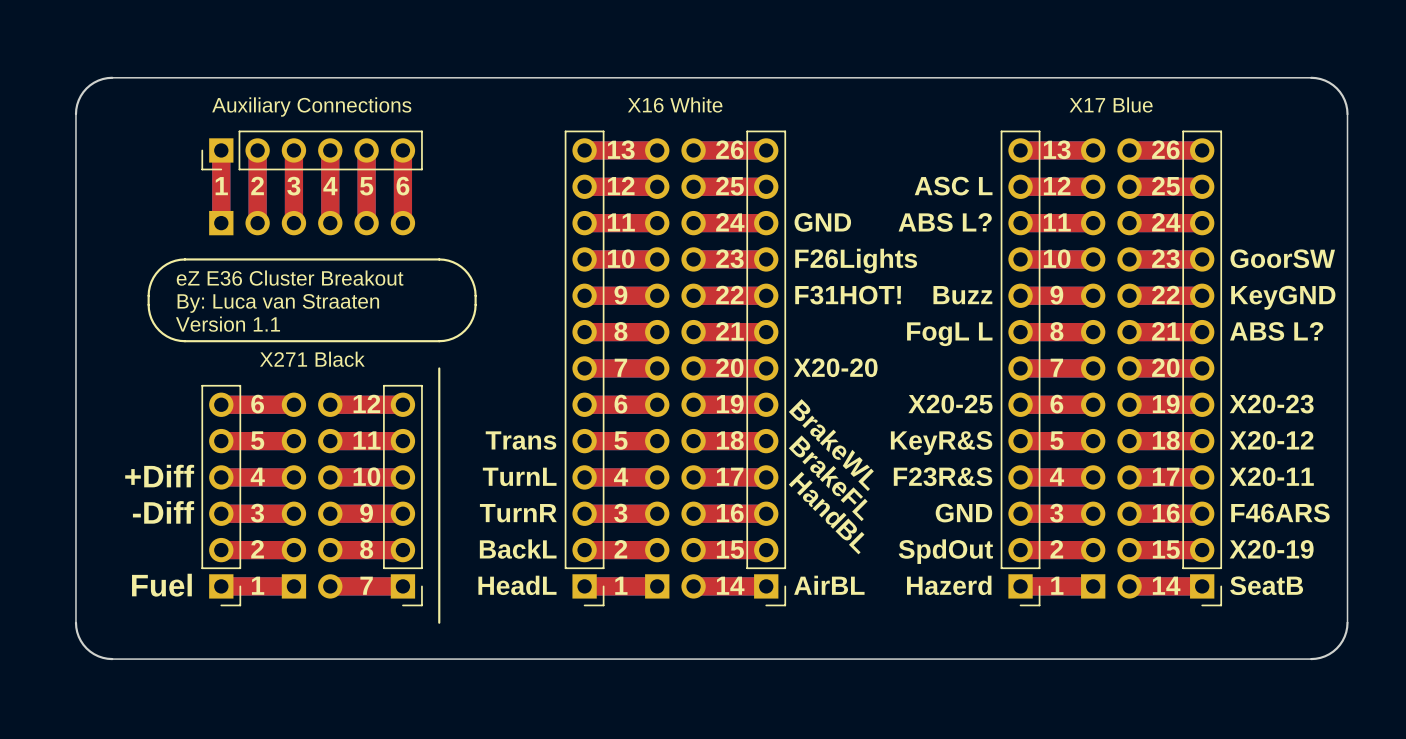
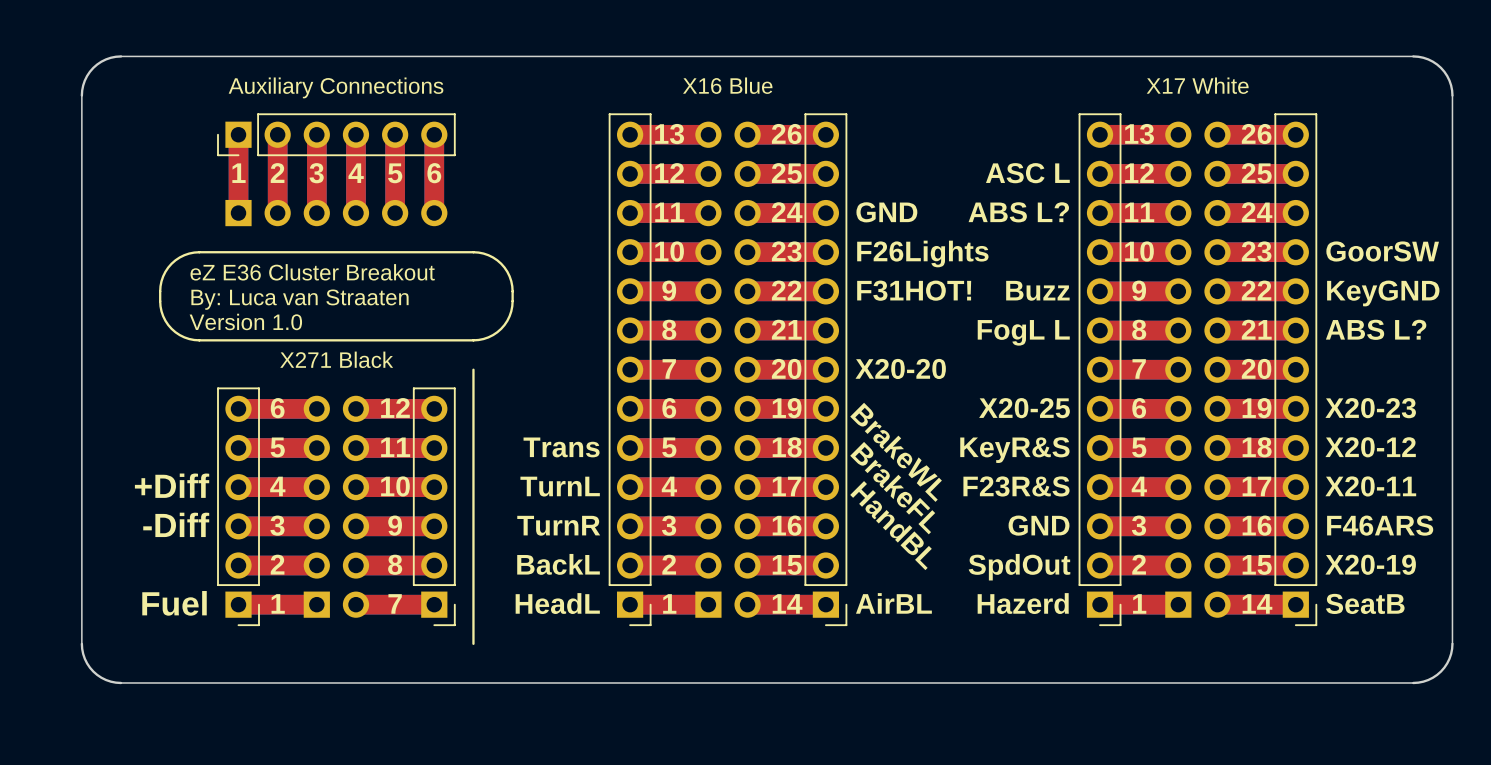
text: X16 White (675, 104) -> X16 Blue (727, 85)
text: X17 Blue (1111, 104) -> X17 White (1197, 85)
text: Version 1.1 (228, 324) -> Version 1.0 (245, 321)

